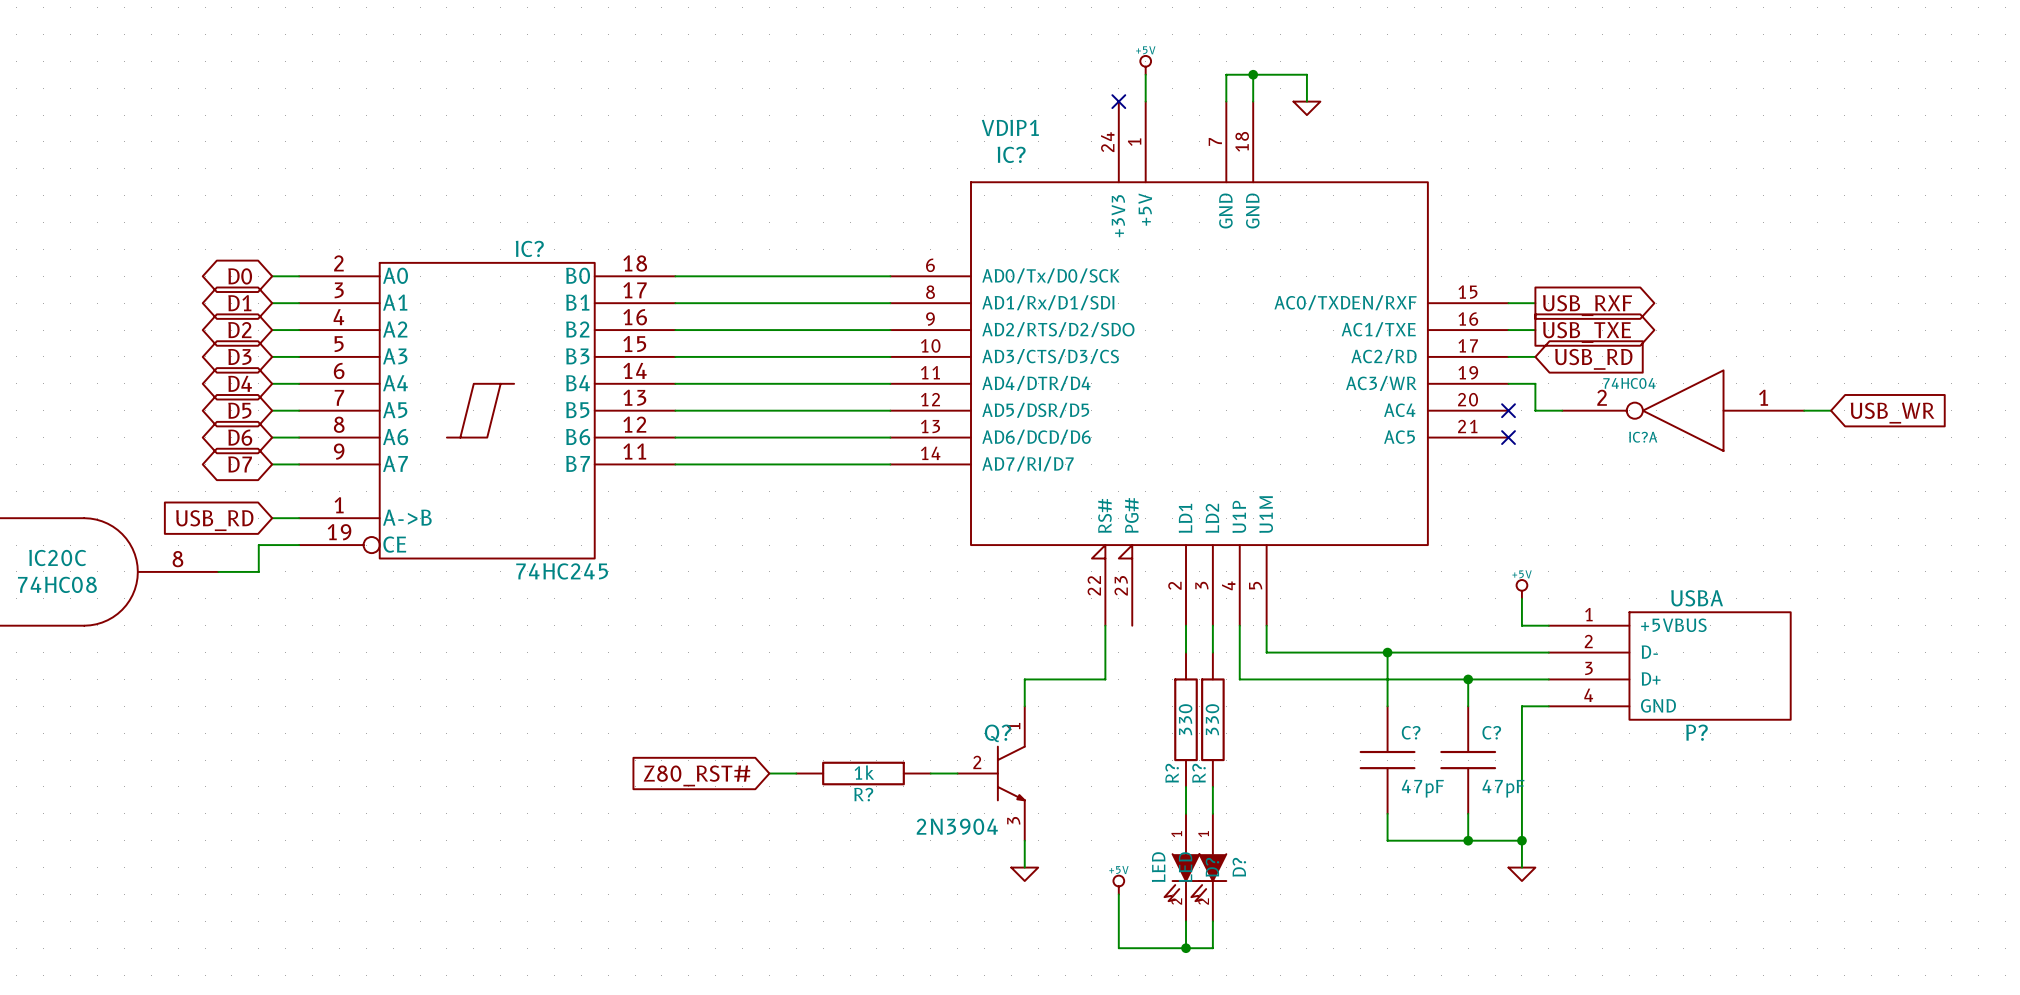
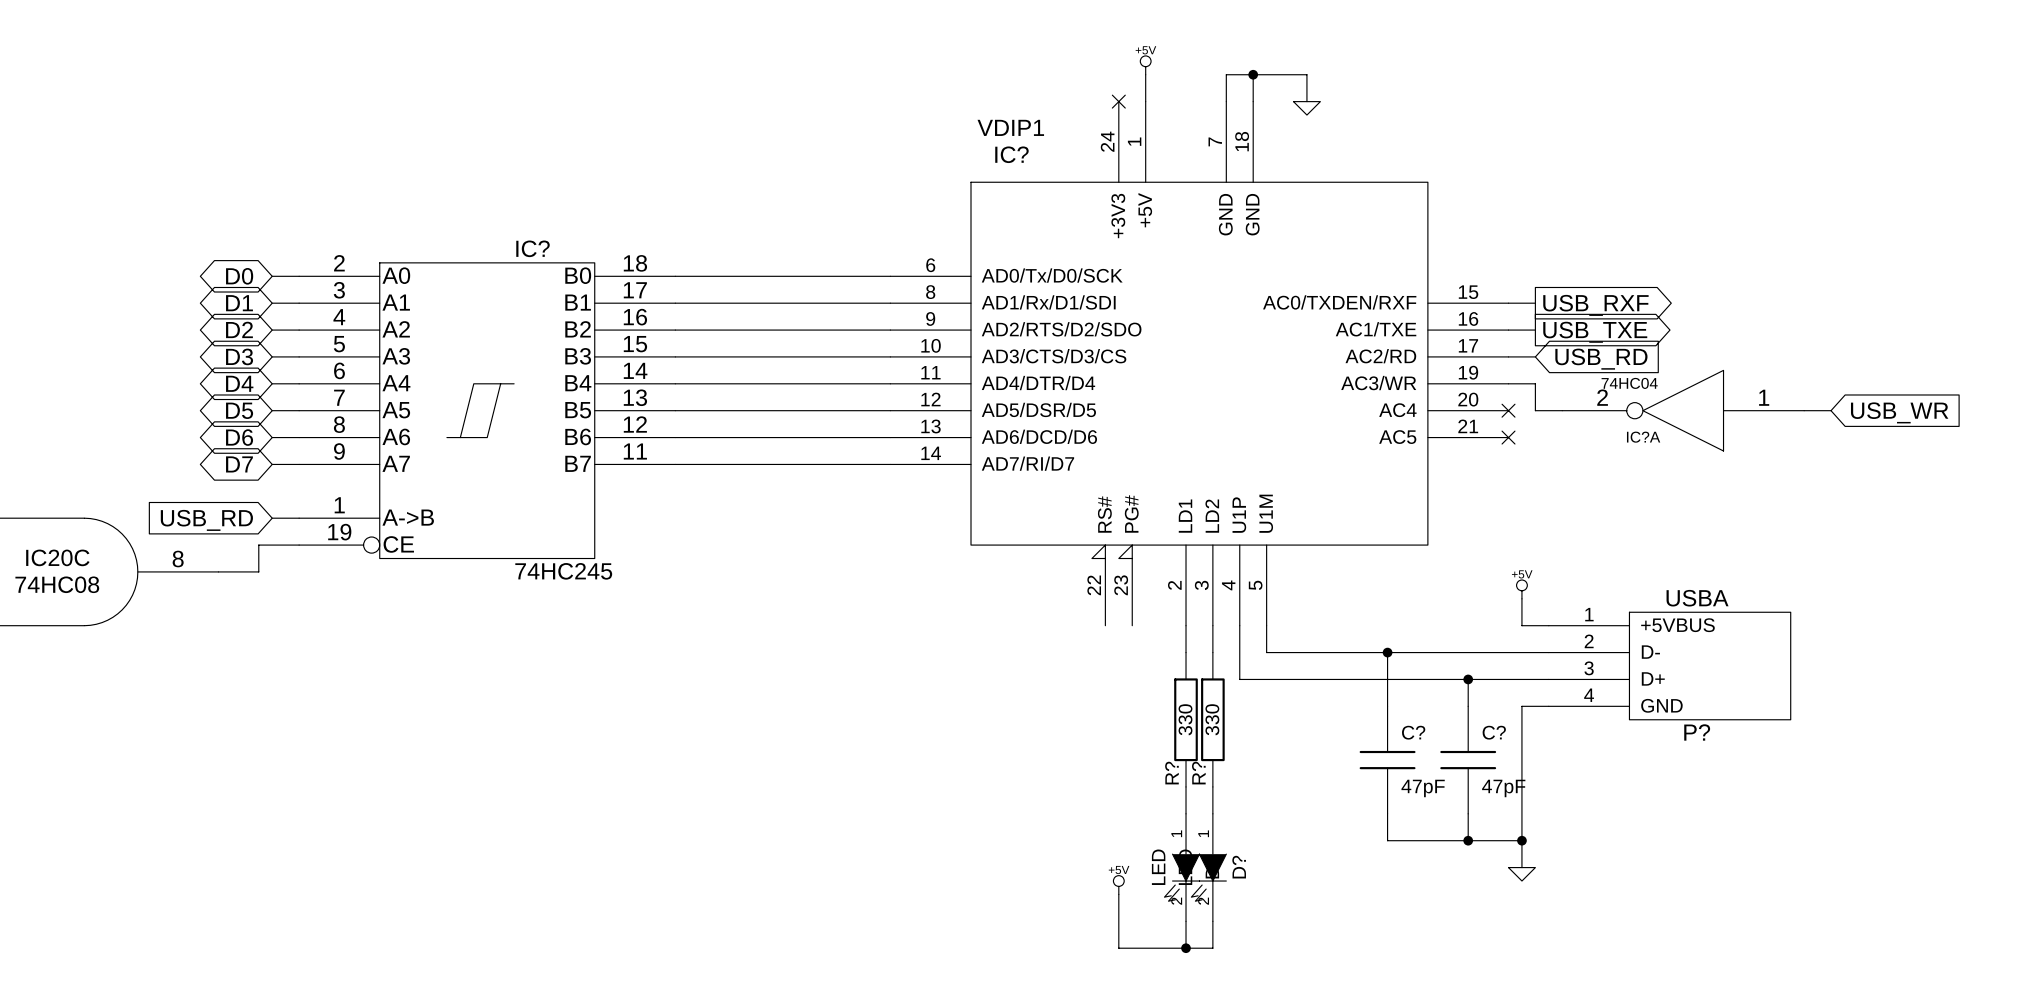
wire: (1105, 625) (1105, 679) (1024, 679) (1024, 706) -> none
wire: (769, 773) (796, 773) -> none
R?: 1k (863, 773) -> none
wire: (930, 773) (957, 773) -> none
Q?: 2N3904 (991, 773) -> none
global label: Z80_RST# (696, 775) -> none
wire: (1024, 840) (1024, 867) -> none
power symbol: (1024, 874) -> none

